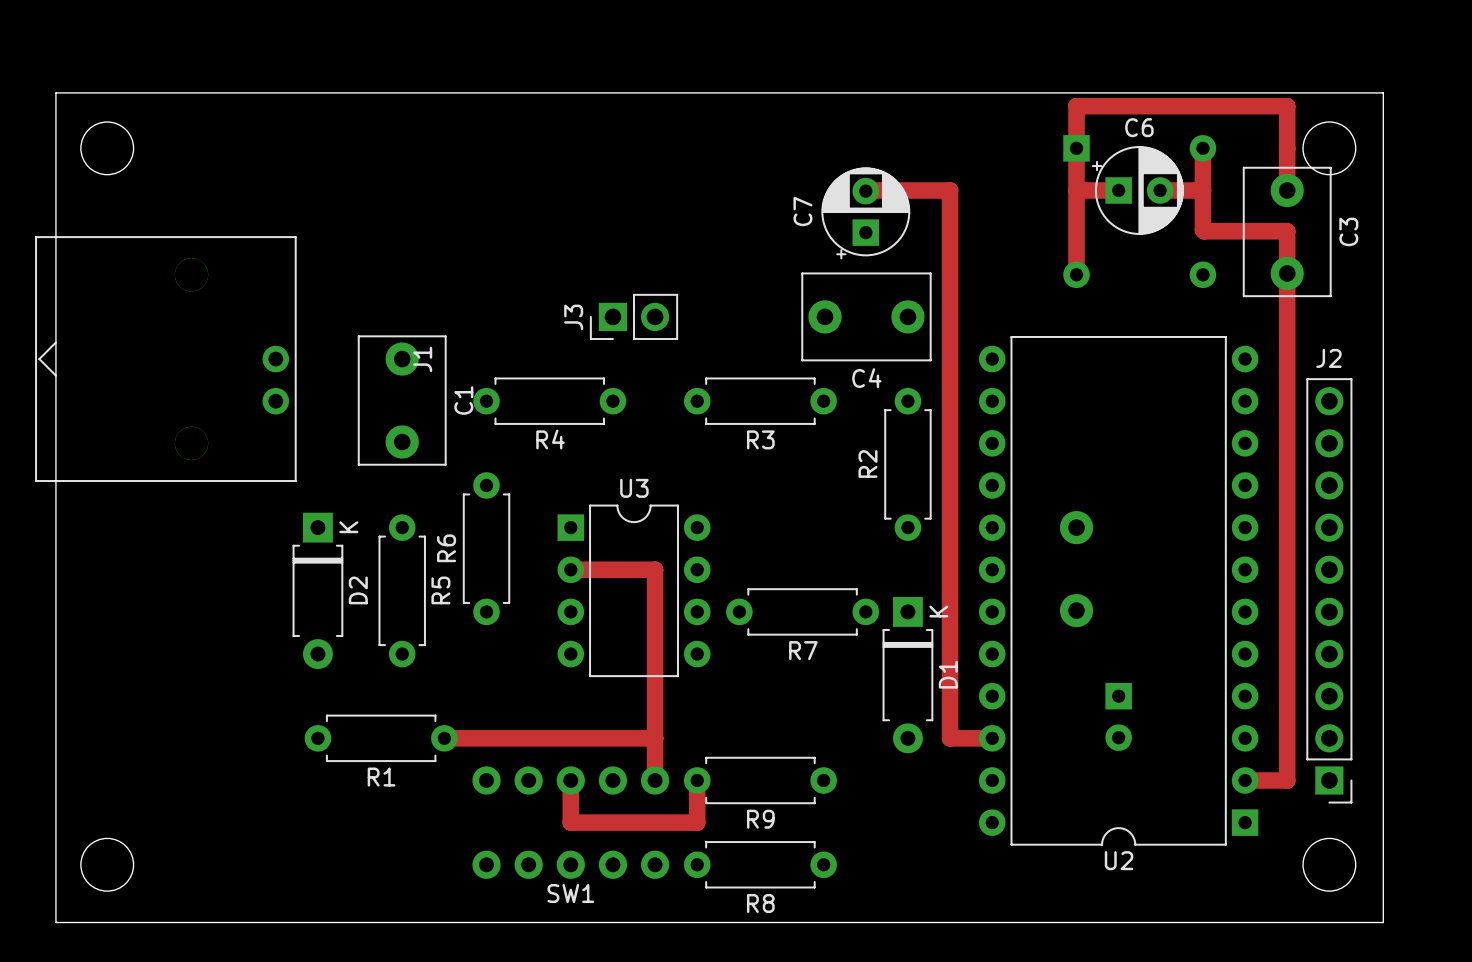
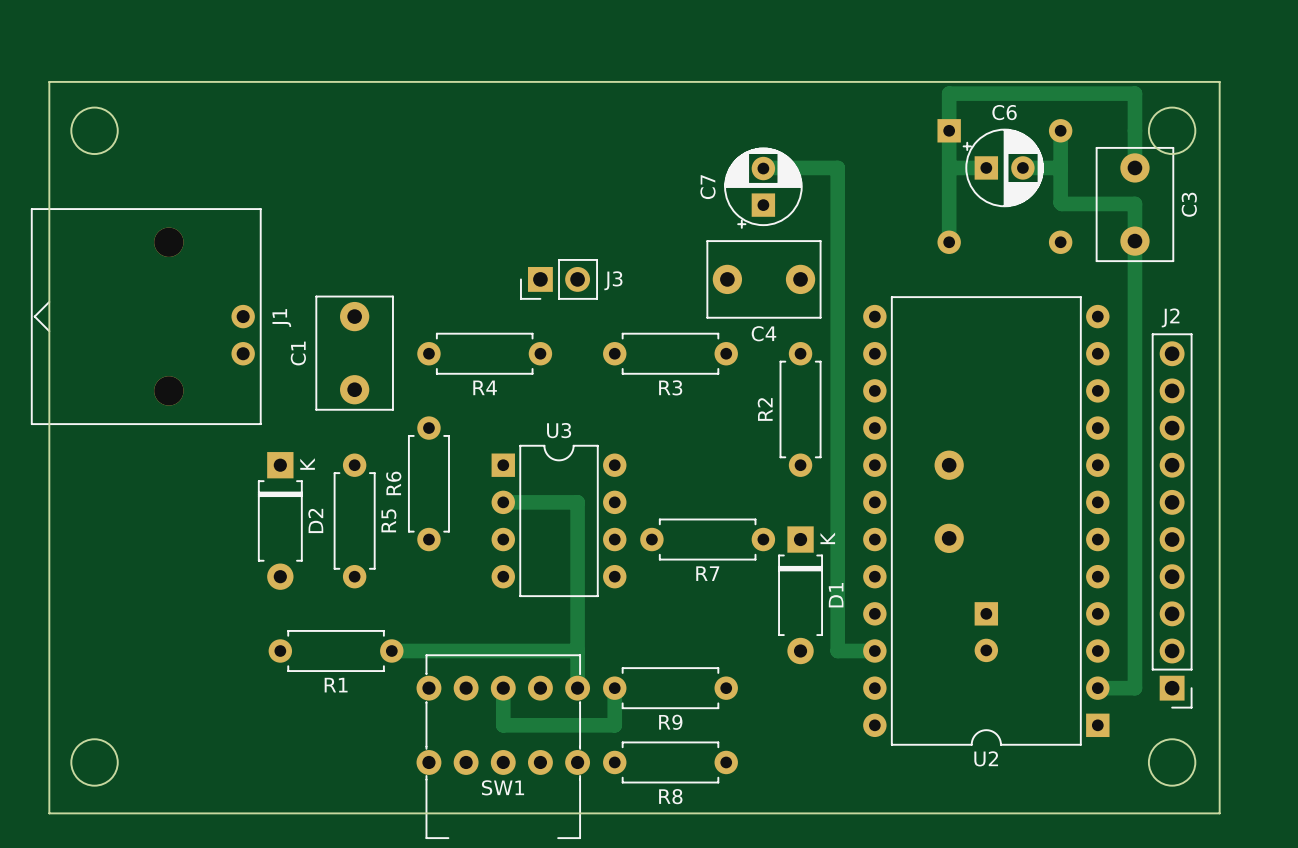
J3 name rotation: 0° (573, 317) -> 90° clockwise (613, 280)
J3 name position: J3 (573, 317) -> J3 (613, 280)
J1 name position: J1 (422, 359) -> J1 (281, 318)
C1 name position: C1 (463, 400) -> C1 (298, 353)
SW1 footprint: [472, 766, 670, 879] -> [416, 654, 591, 839]

